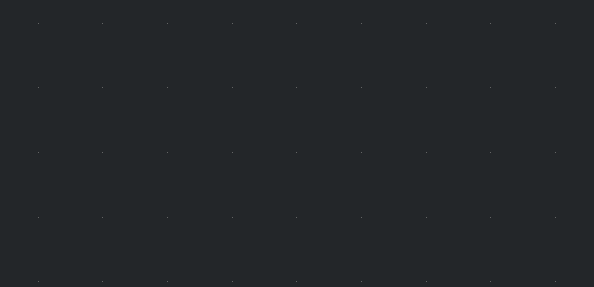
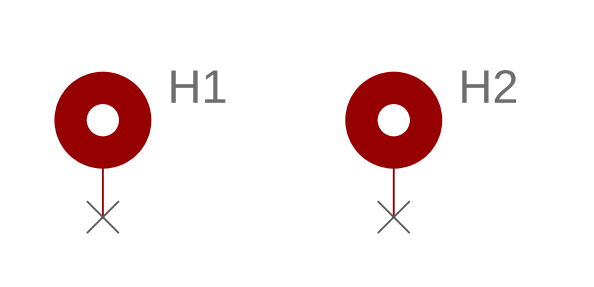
H1: none -> (102, 144)
H2: none -> (393, 144)
no-connect mark: none -> (102, 217)
no-connect mark: none -> (393, 217)

